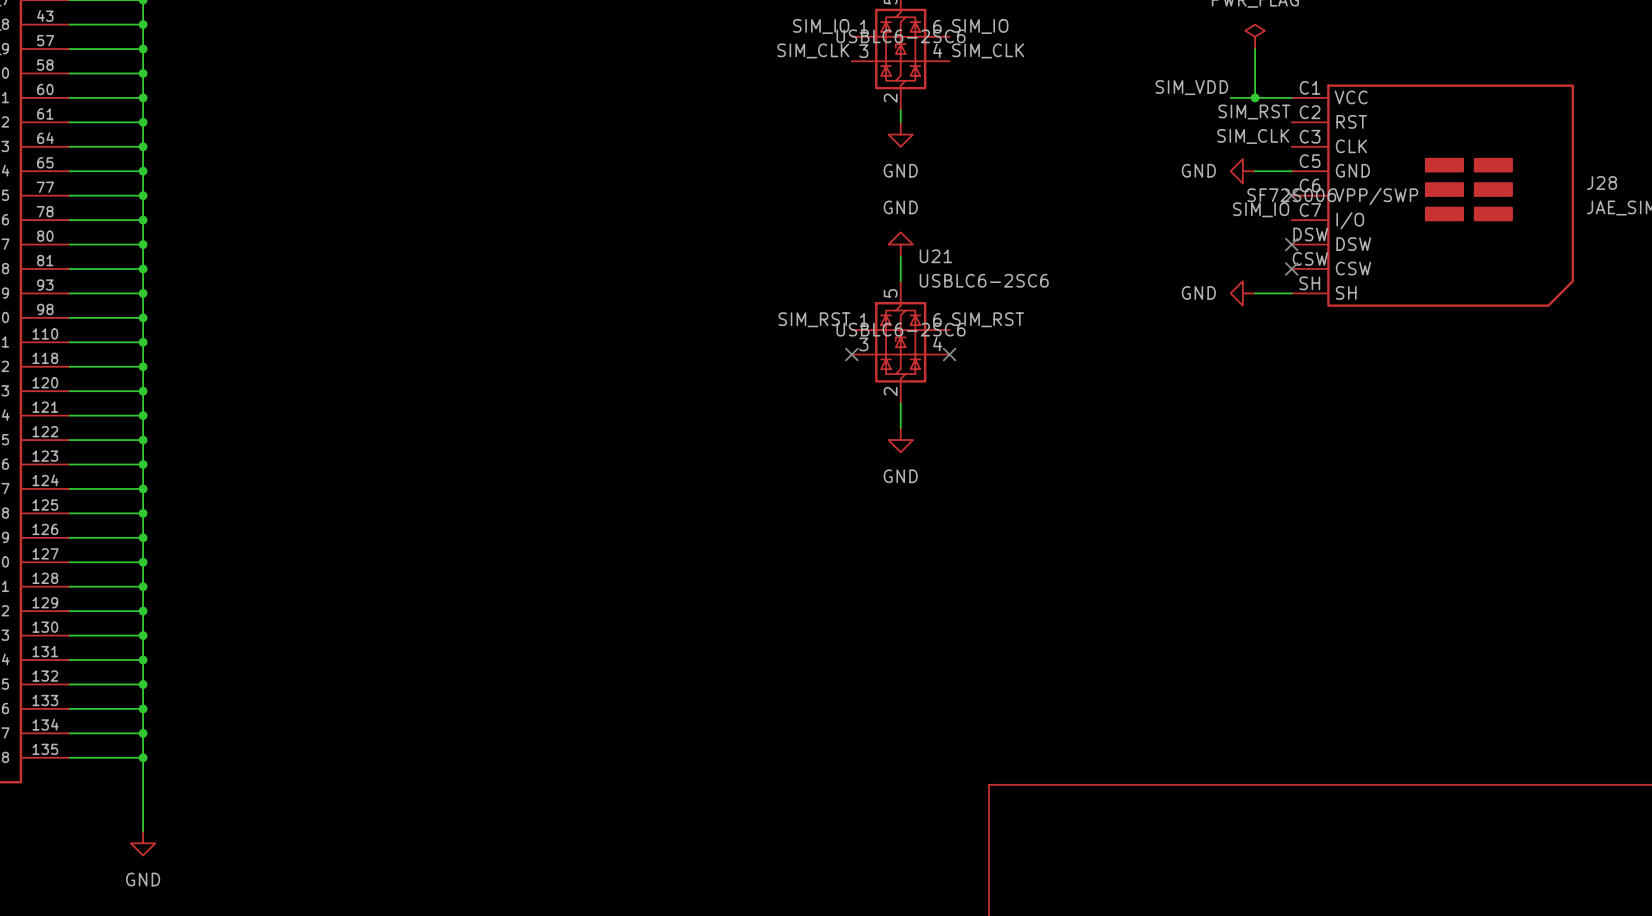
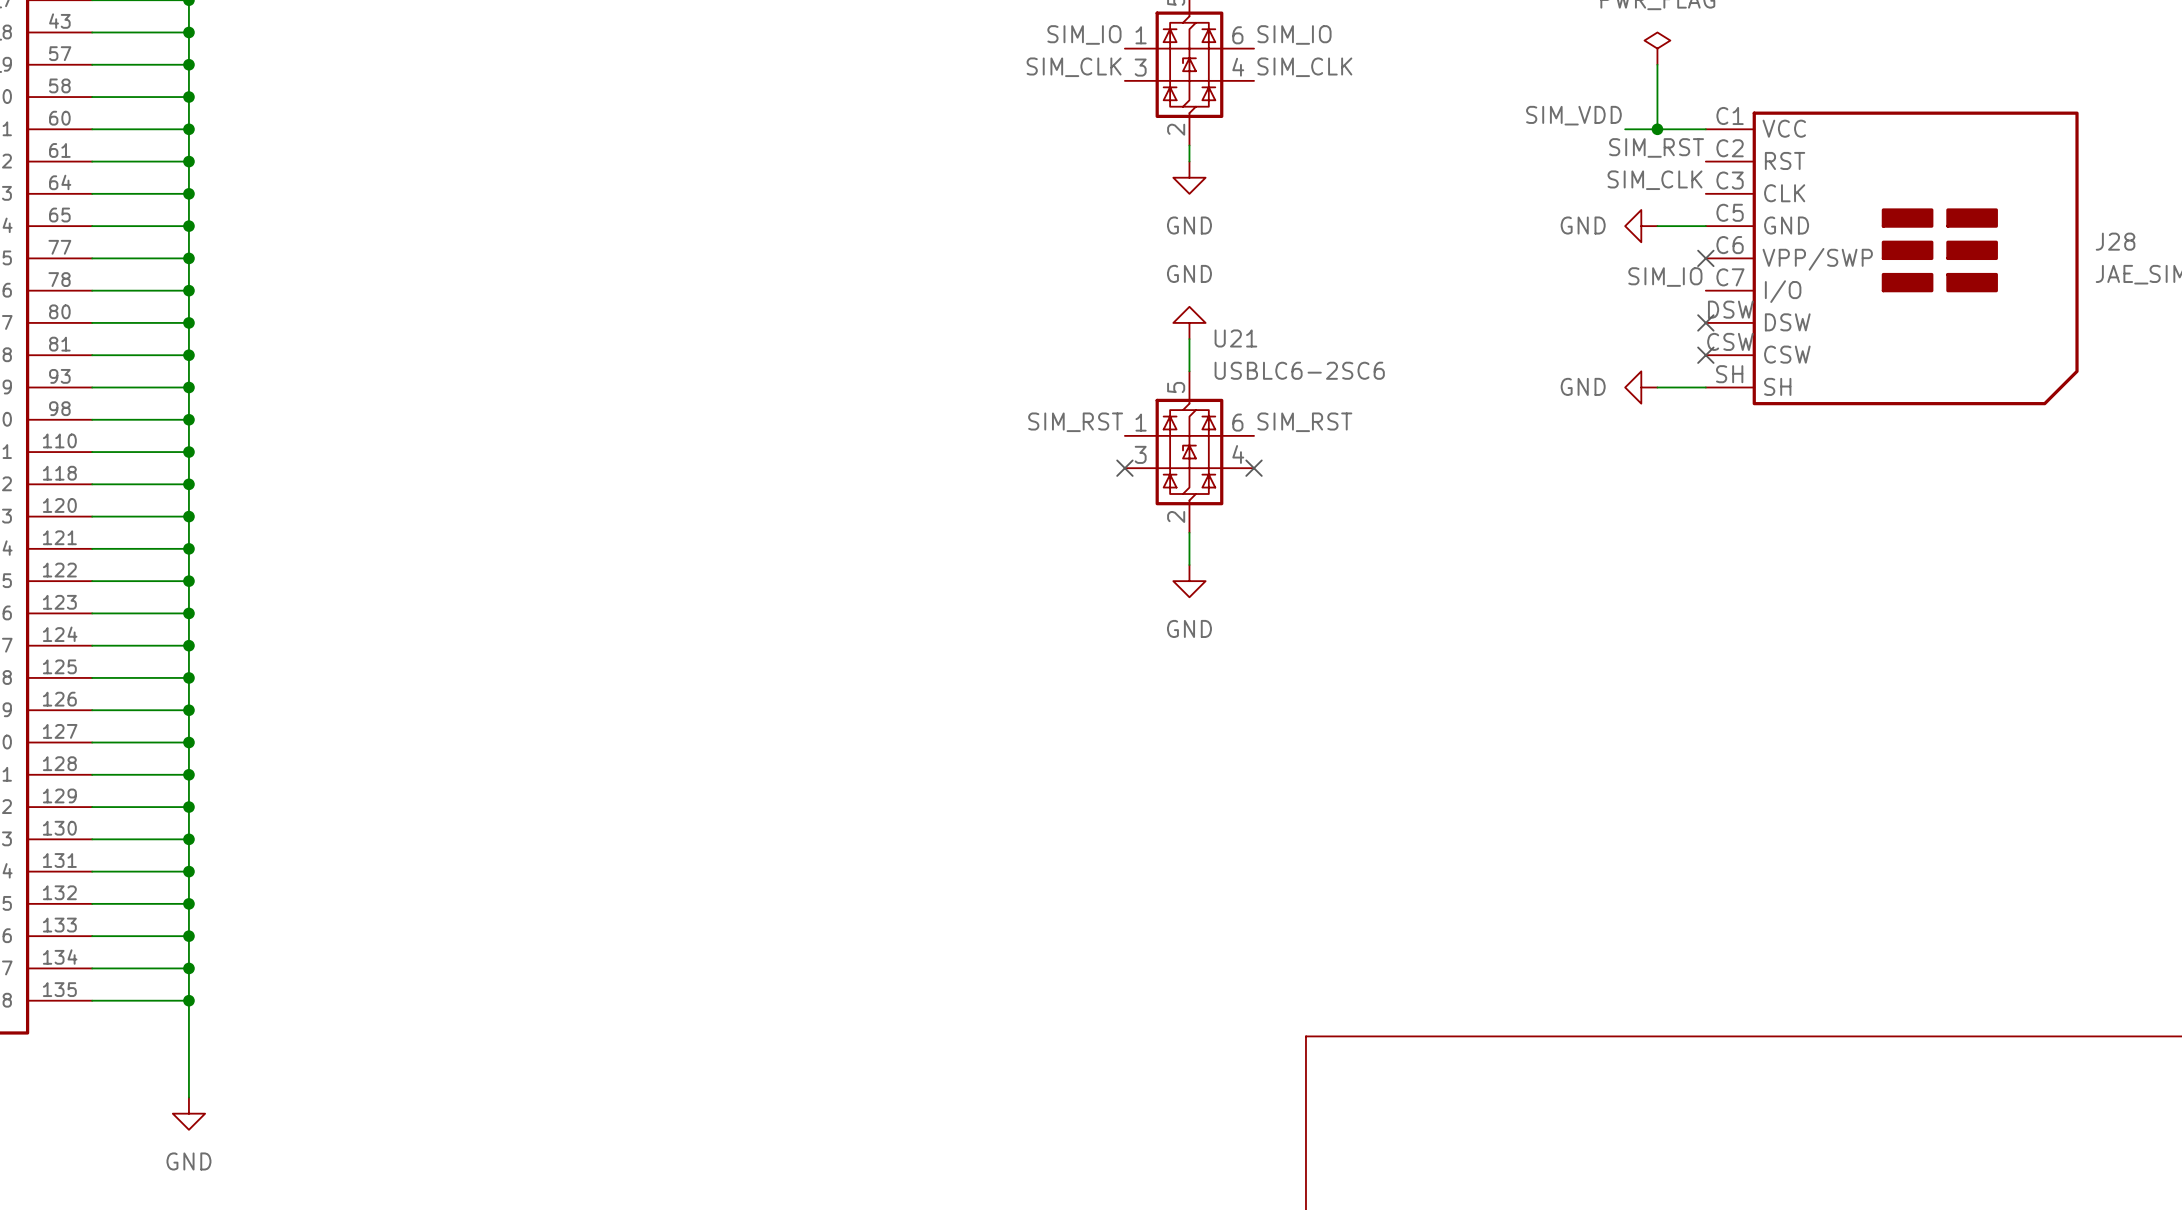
part text: USBLC6-2SC6 (901, 36) -> none
J28 text: SF72S006 (1291, 195) -> none
U21 text: USBLC6-2SC6 (901, 329) -> none

